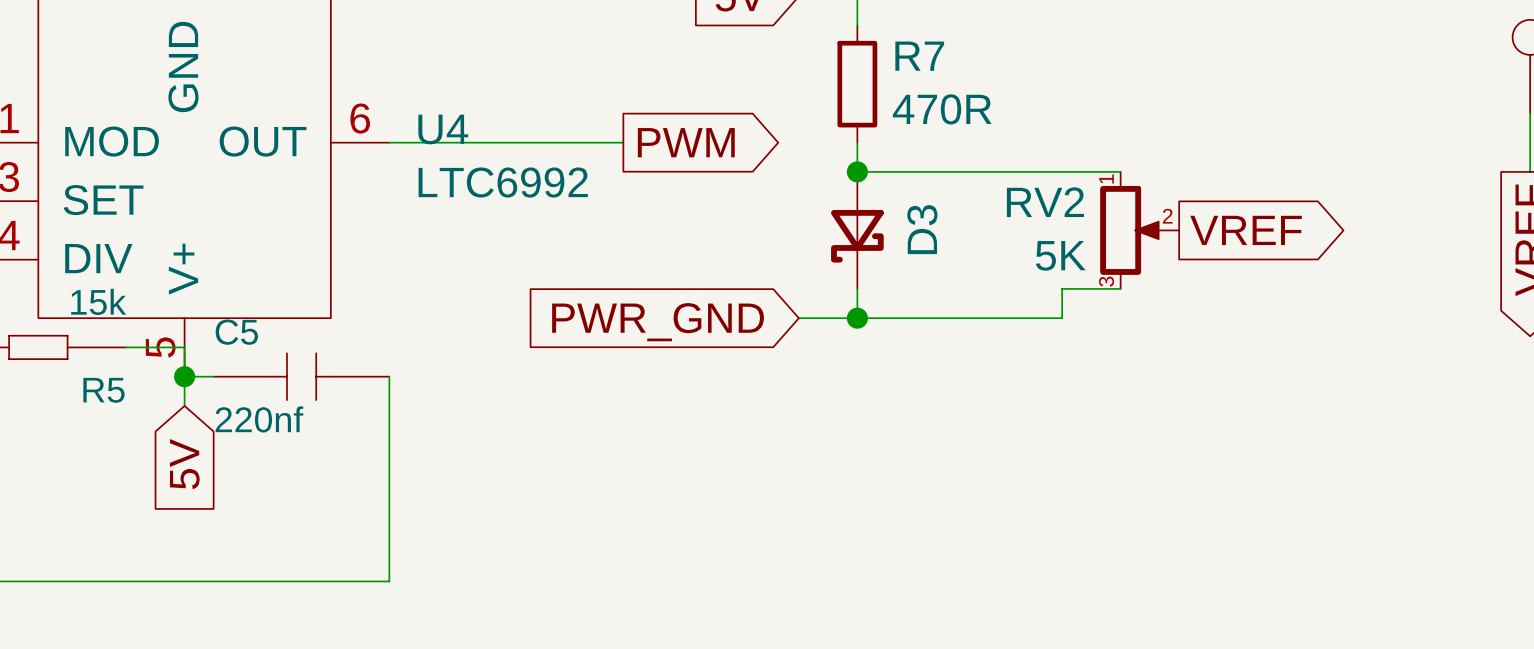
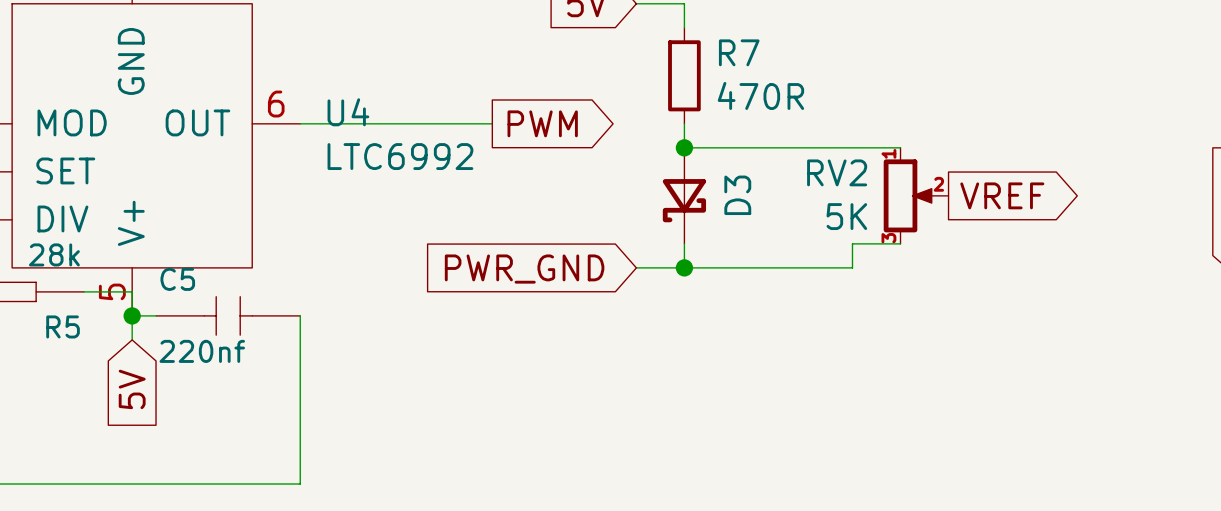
R5 value: 15k (98, 301) -> 28k (54, 254)

